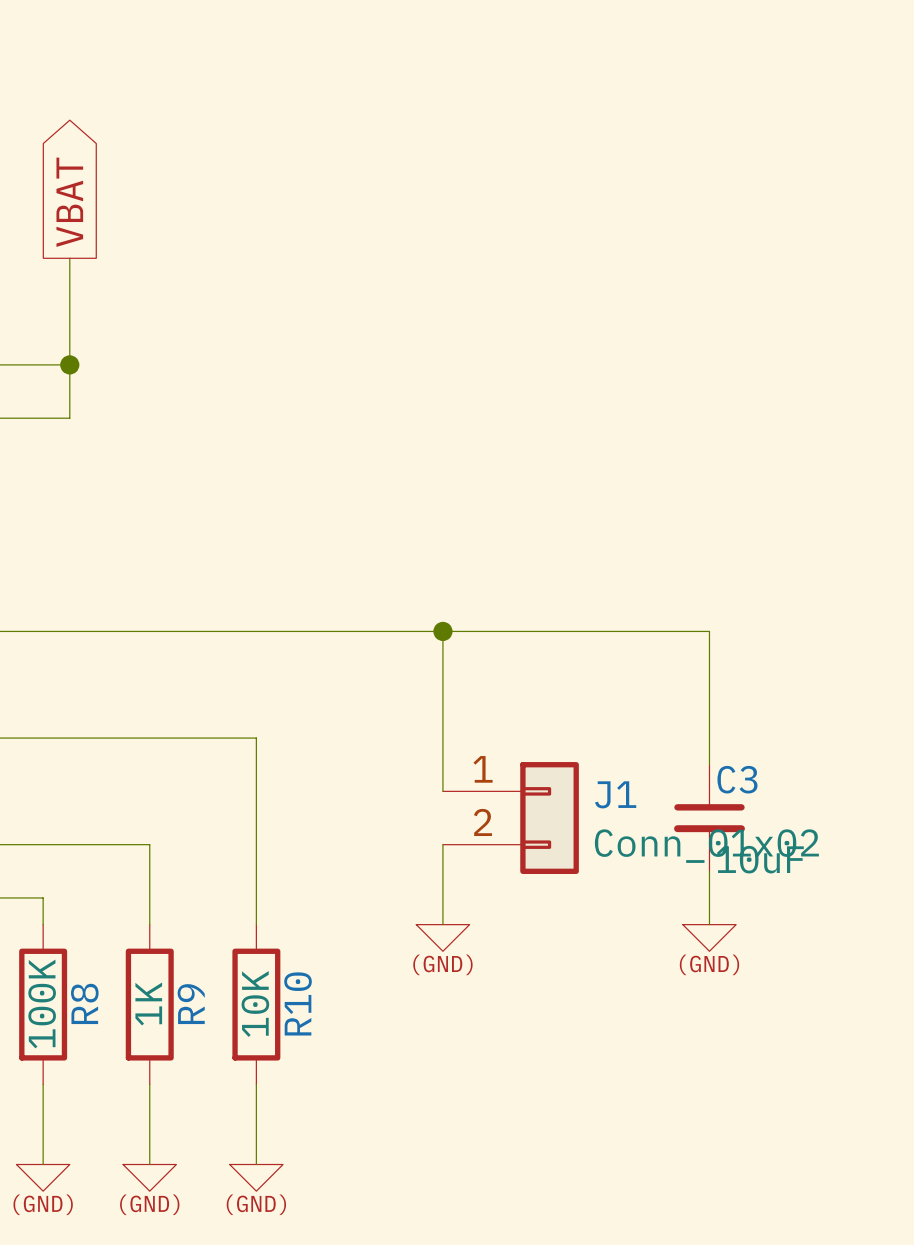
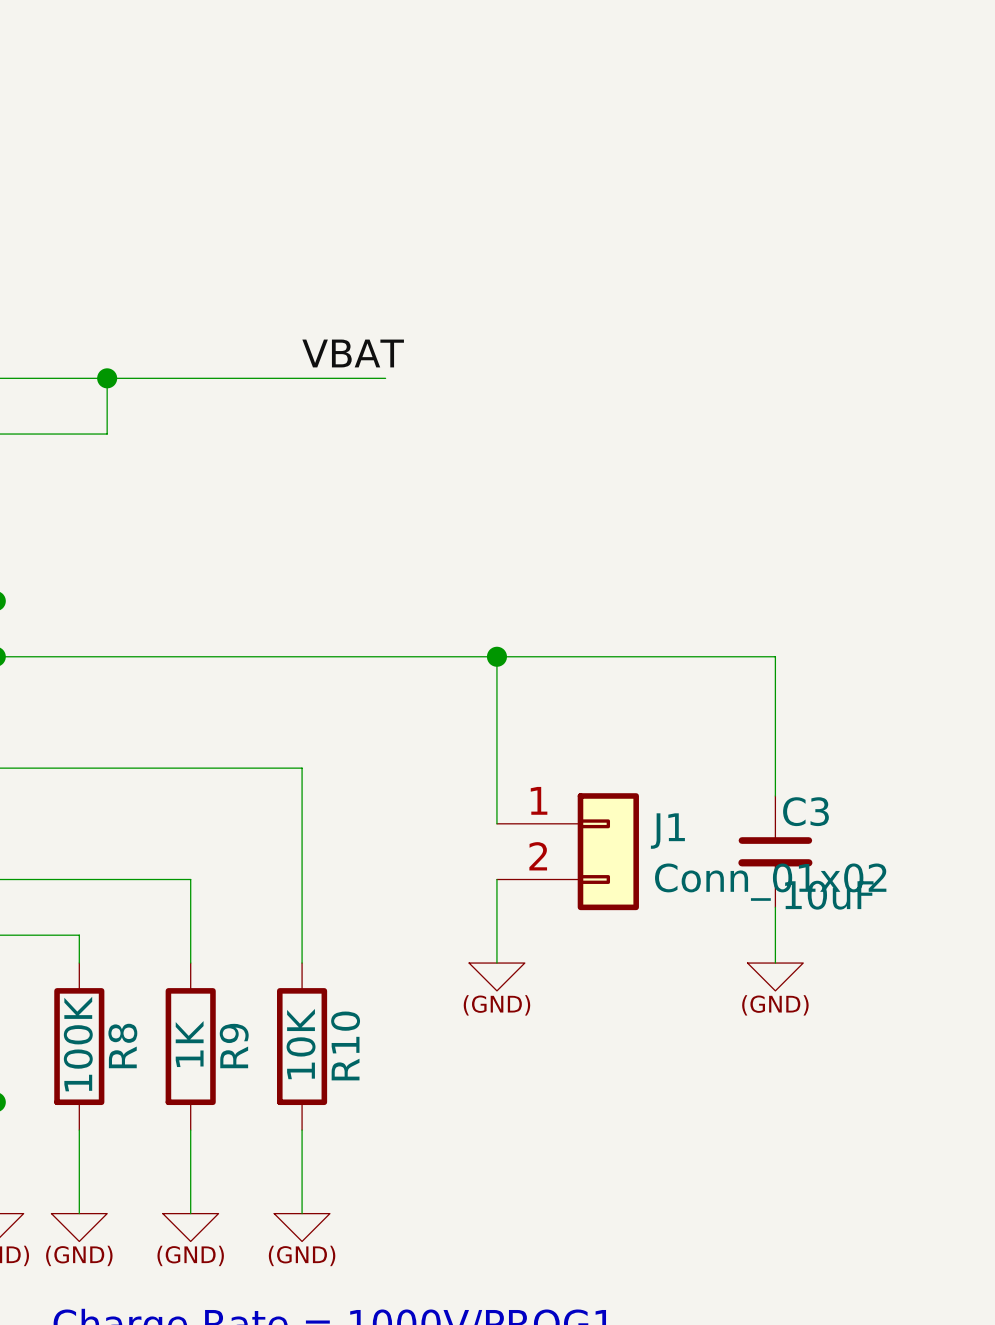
global label: VBAT (69, 202) -> none
wire: (69, 258) (69, 364) -> (385, 378) (107, 378)
label: none -> VBAT (353, 353)

